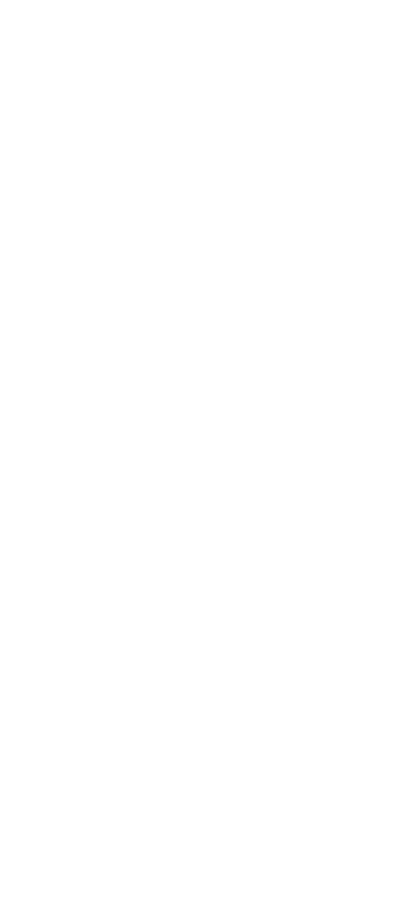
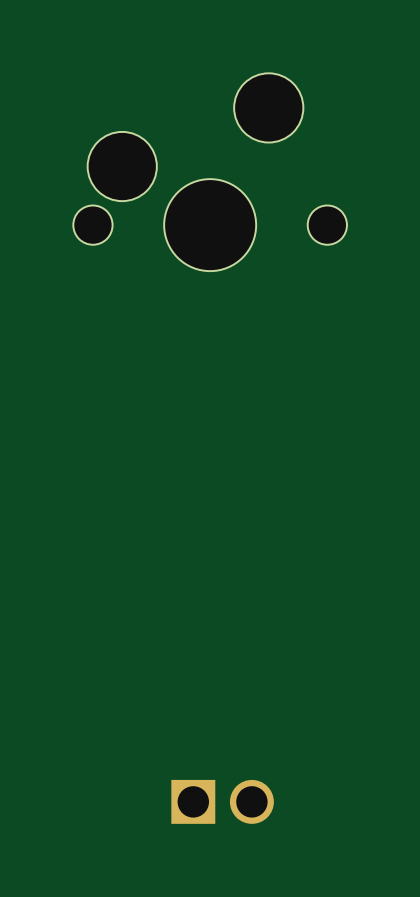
part: none -> (210, 172)
part: none -> (222, 801)

